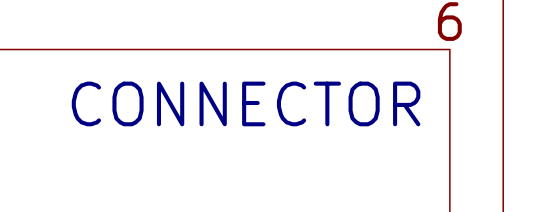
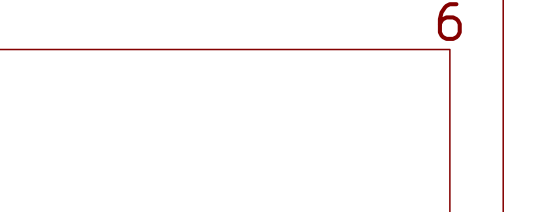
text: CONNECTOR (246, 103) -> none

